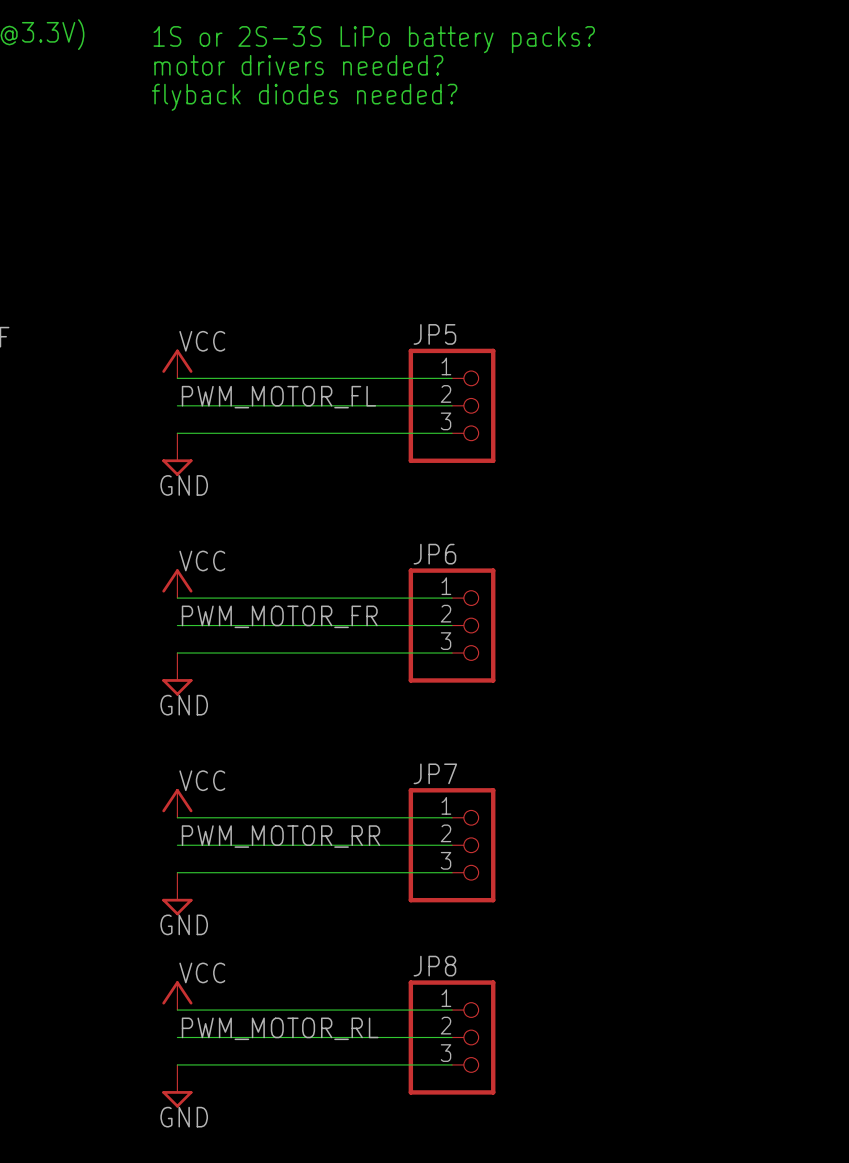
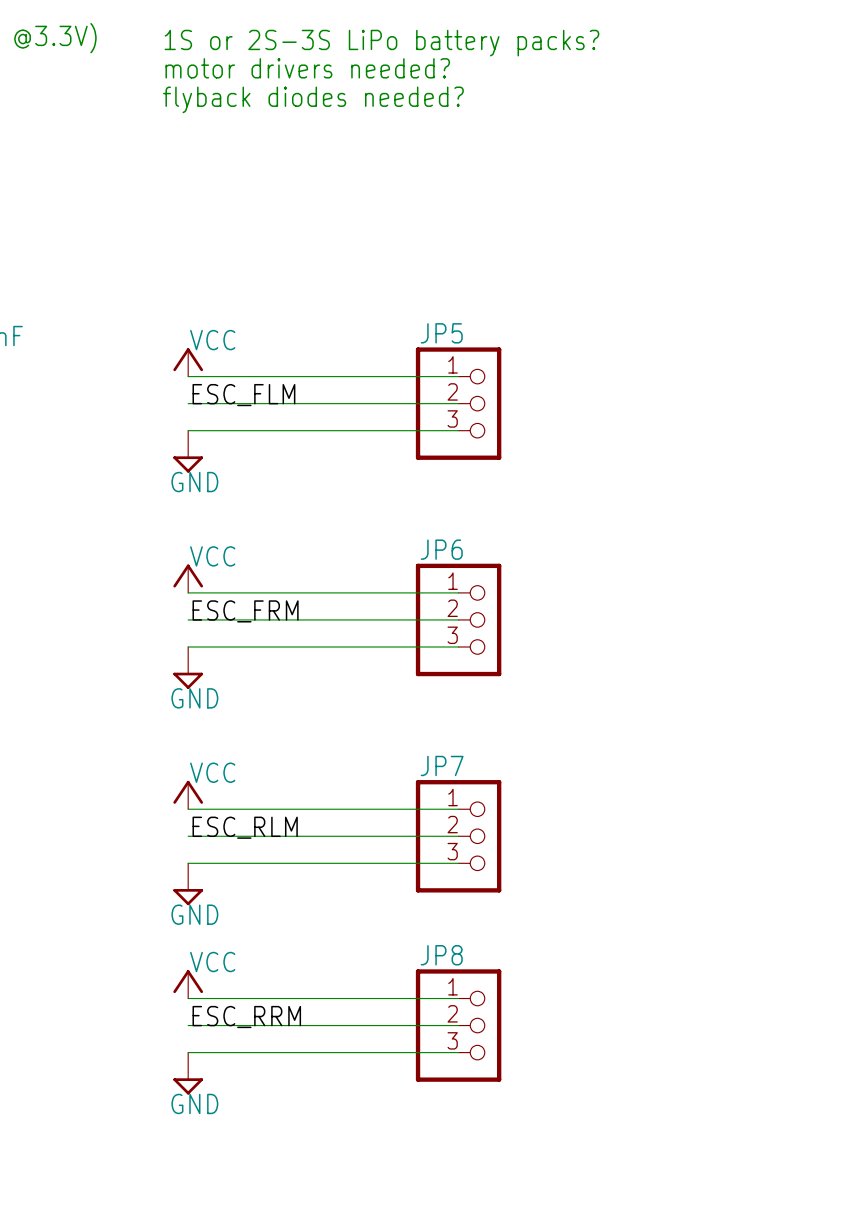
label: PWM_MOTOR_FL (278, 397) -> ESC_FLM (243, 395)
label: PWM_MOTOR_FR (279, 616) -> ESC_FRM (245, 611)
label: PWM_MOTOR_RR (280, 836) -> ESC_RLM (245, 827)
label: PWM_MOTOR_RL (280, 1028) -> ESC_RRM (246, 1016)

